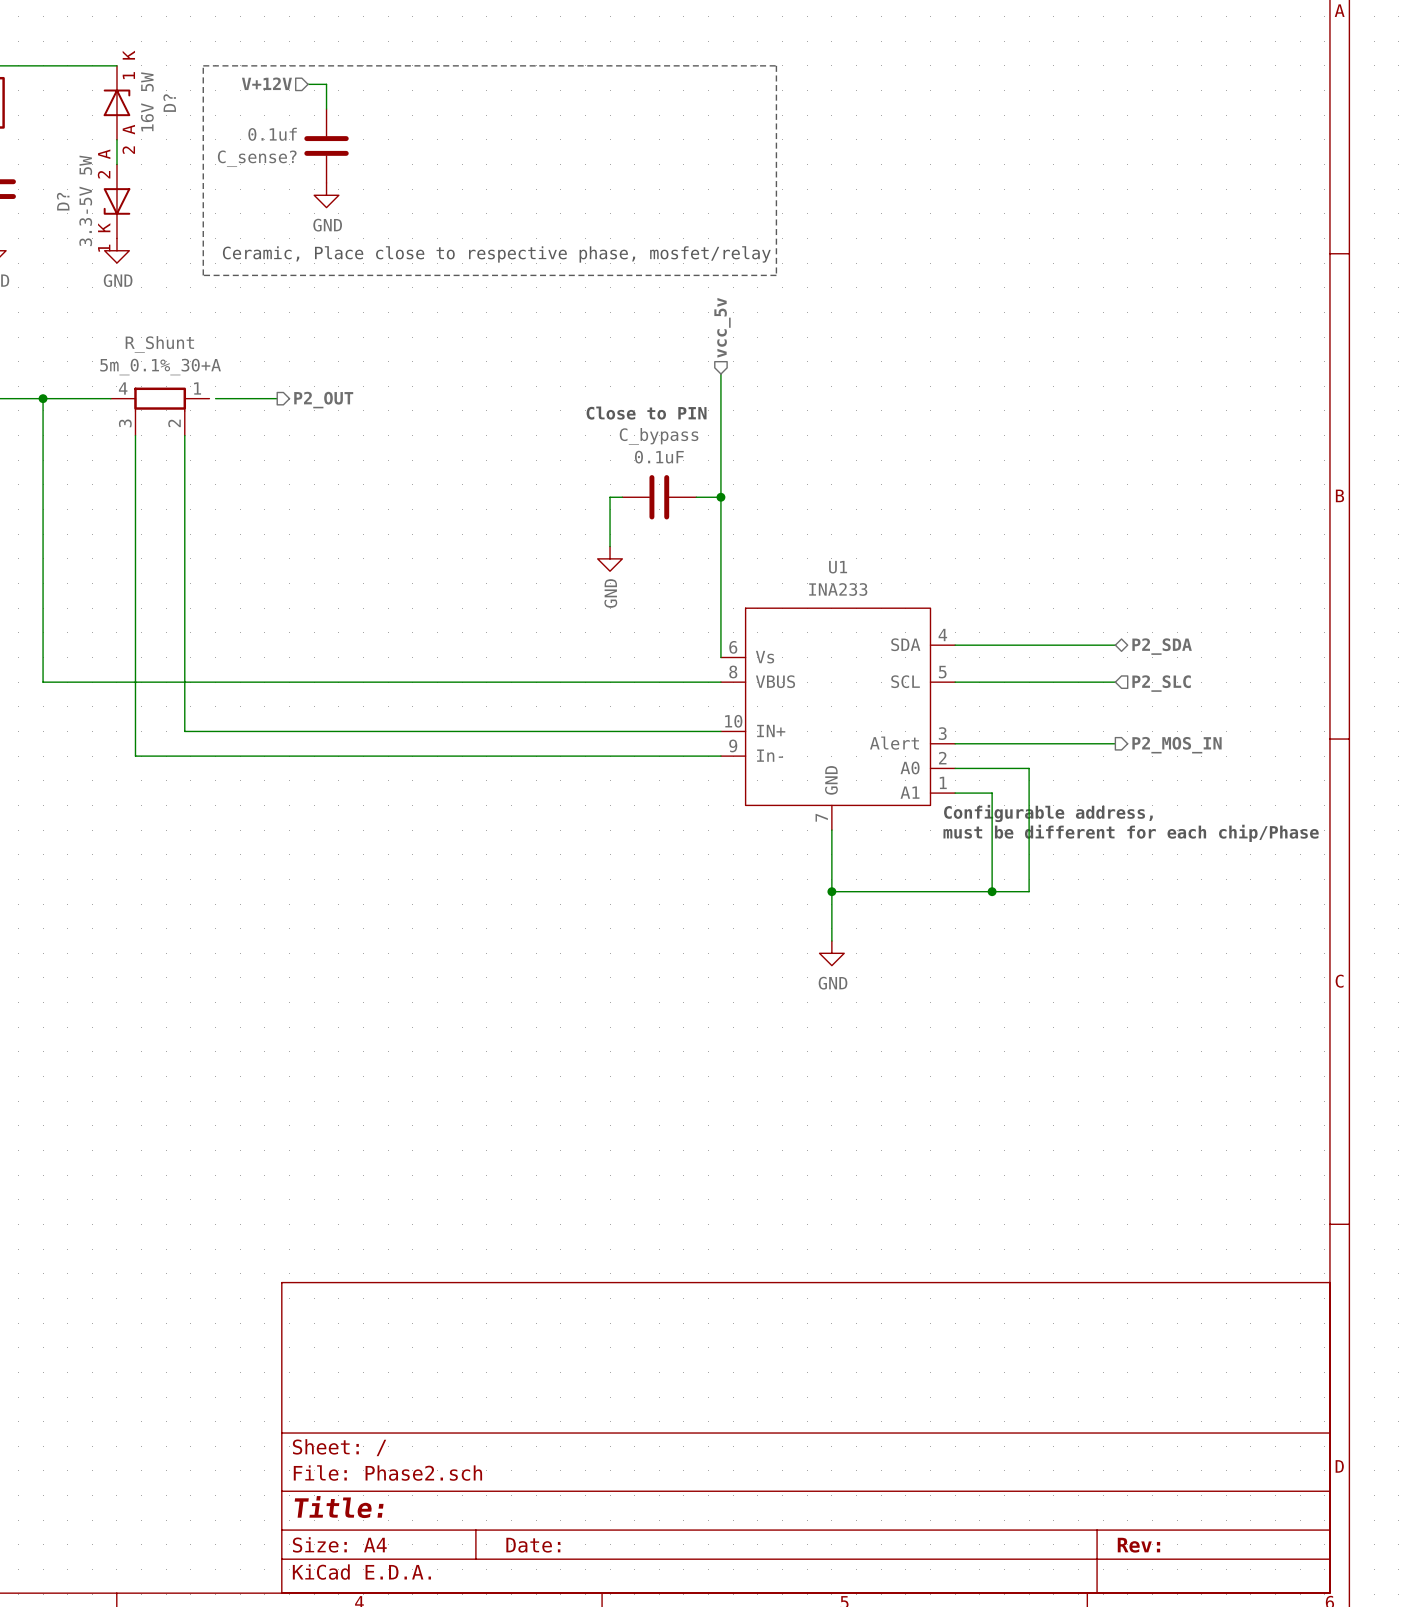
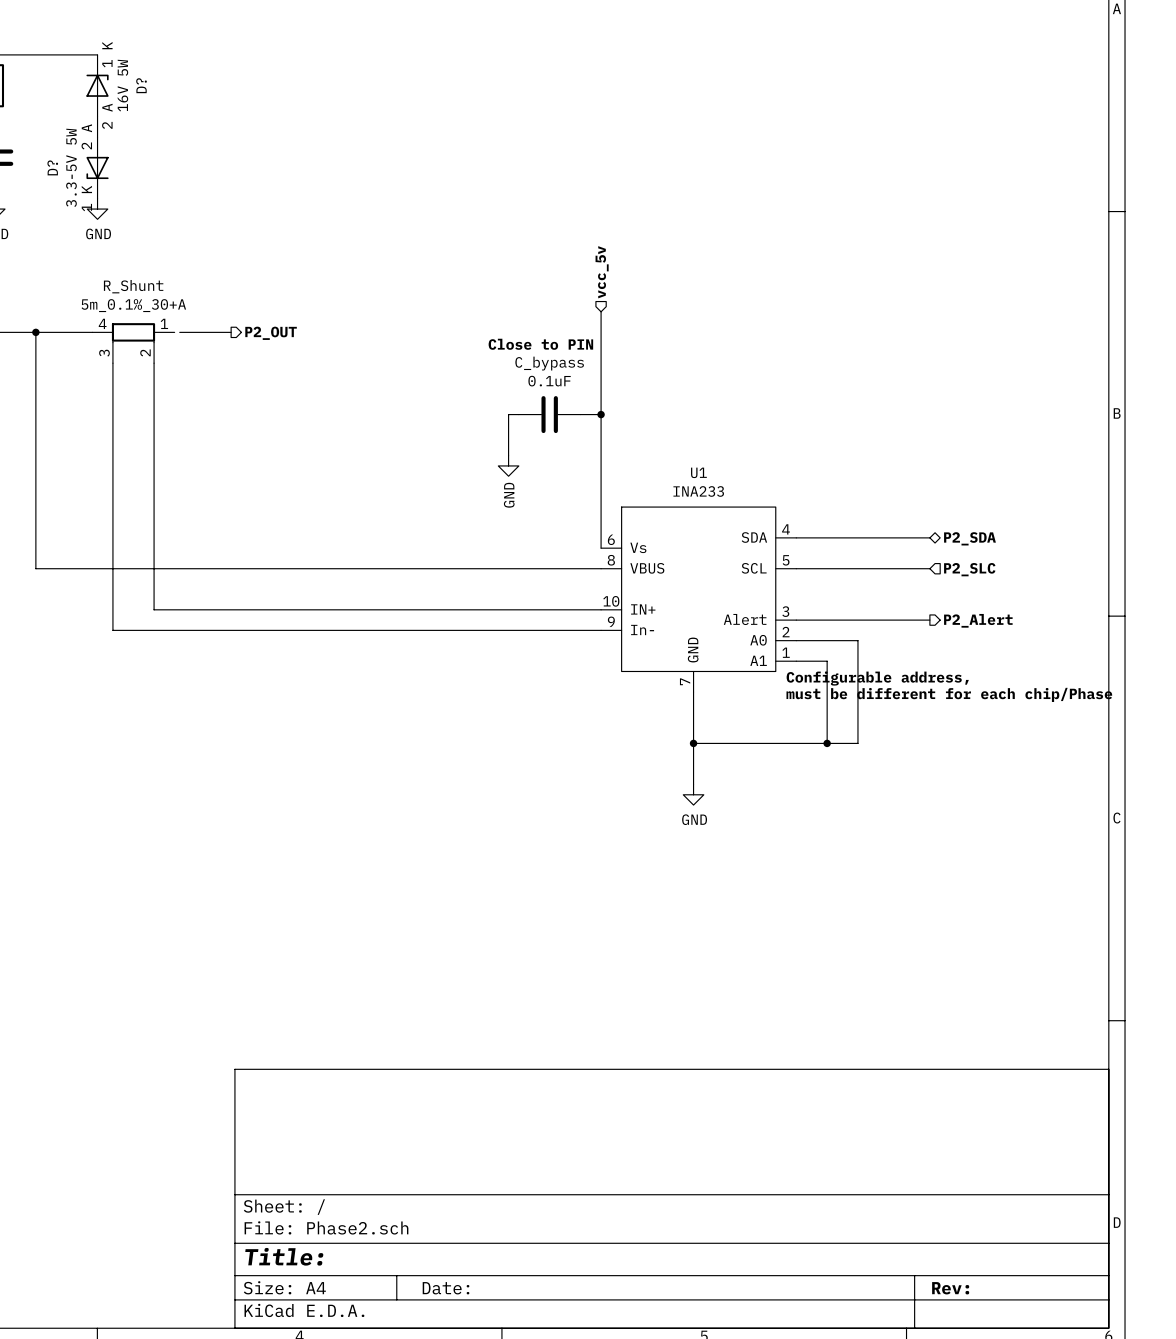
line: (203, 65) (776, 65) (776, 275) (203, 275) (203, 65) -> none
hierarchical label: V+12V (266, 83) -> none
wire: (308, 84) (326, 84) (326, 109) -> none
C_sense?: 0.1uf (326, 145) -> none
power symbol: GND (326, 195) -> none
text: Ceramic, Place close to respective phase, mosfet/relay (496, 254) -> none
hierarchical label: P2_MOS_IN (1177, 745) -> P2_Alert (978, 620)

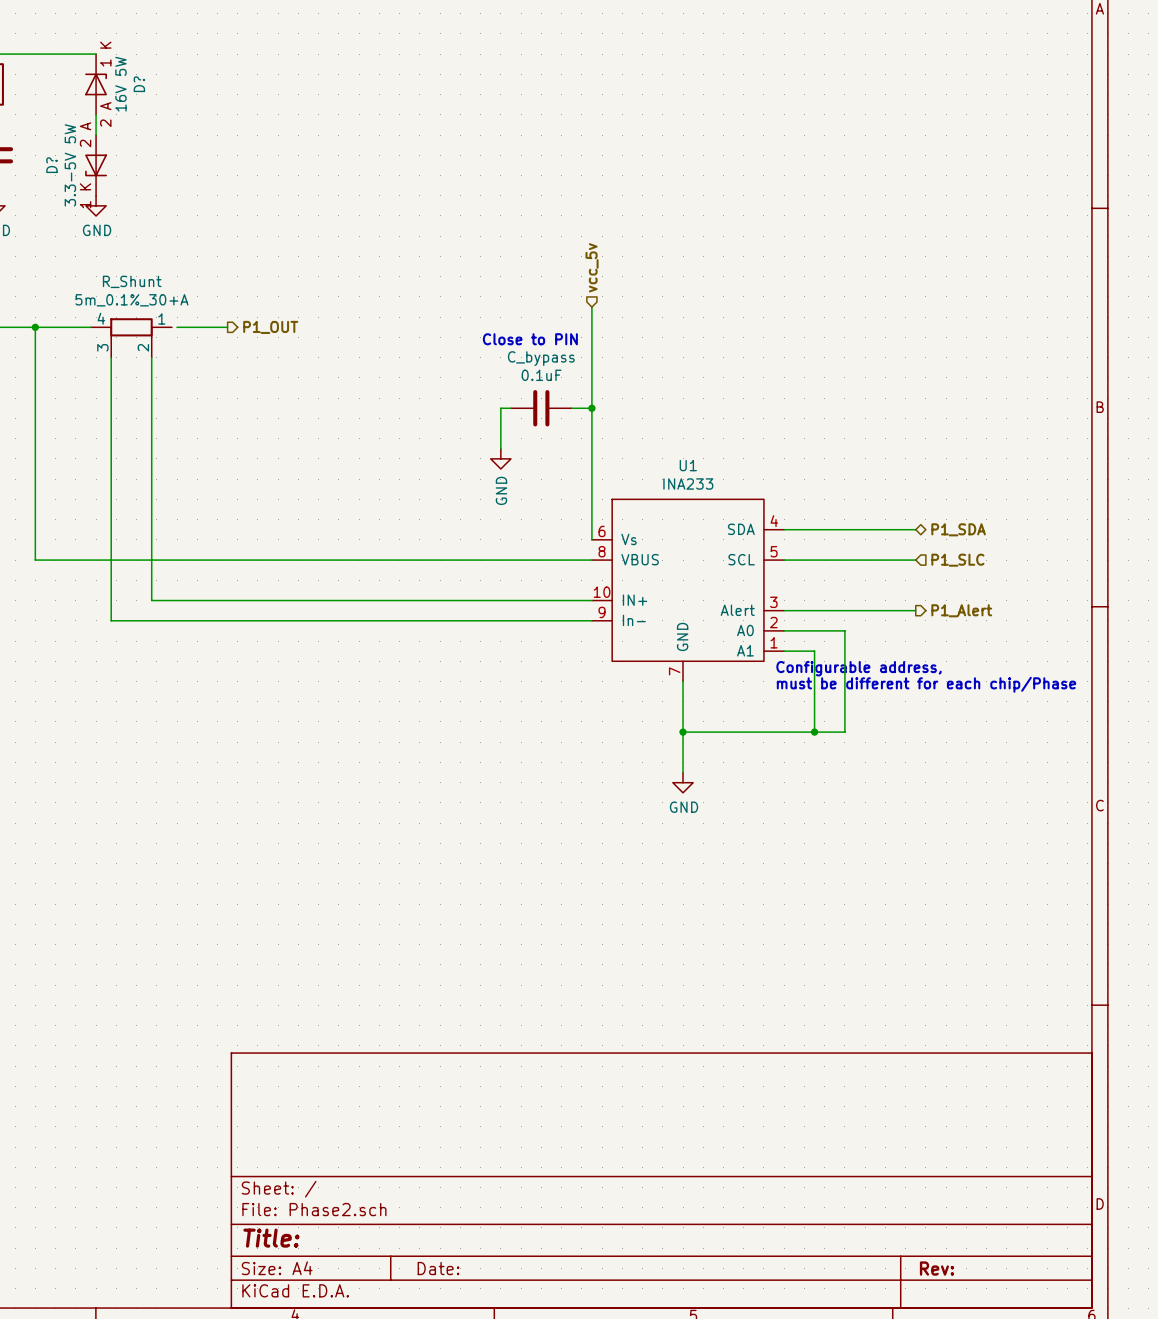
hierarchical label: P2_OUT (271, 333) -> P1_OUT (270, 327)
hierarchical label: P2_SDA (969, 538) -> P1_SDA (958, 529)
hierarchical label: P2_SLC (969, 569) -> P1_SLC (957, 560)
hierarchical label: P2_Alert (978, 620) -> P1_Alert (961, 610)

